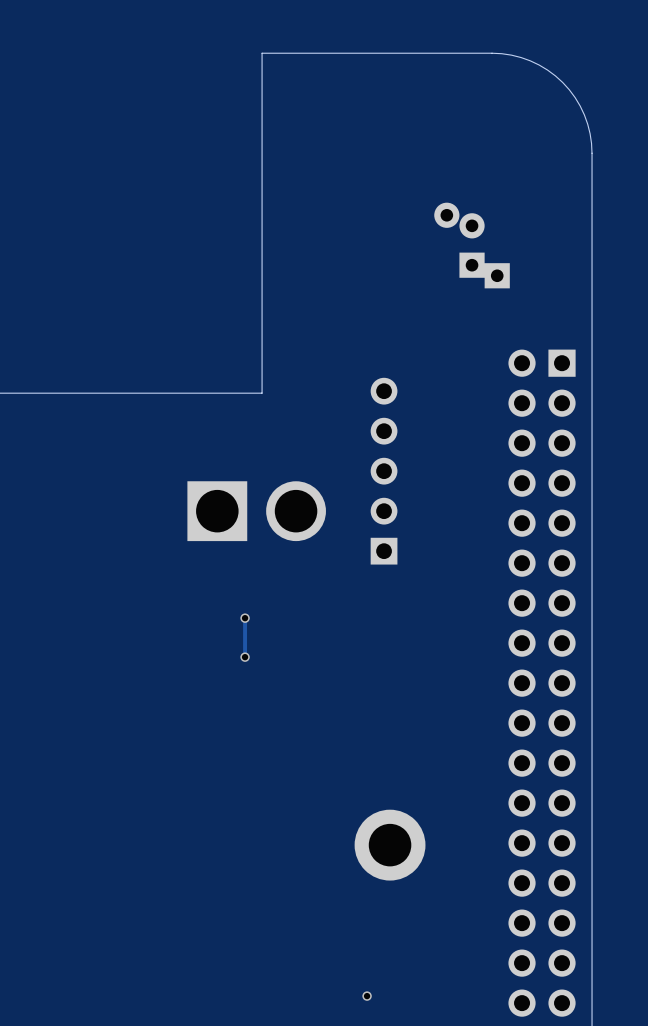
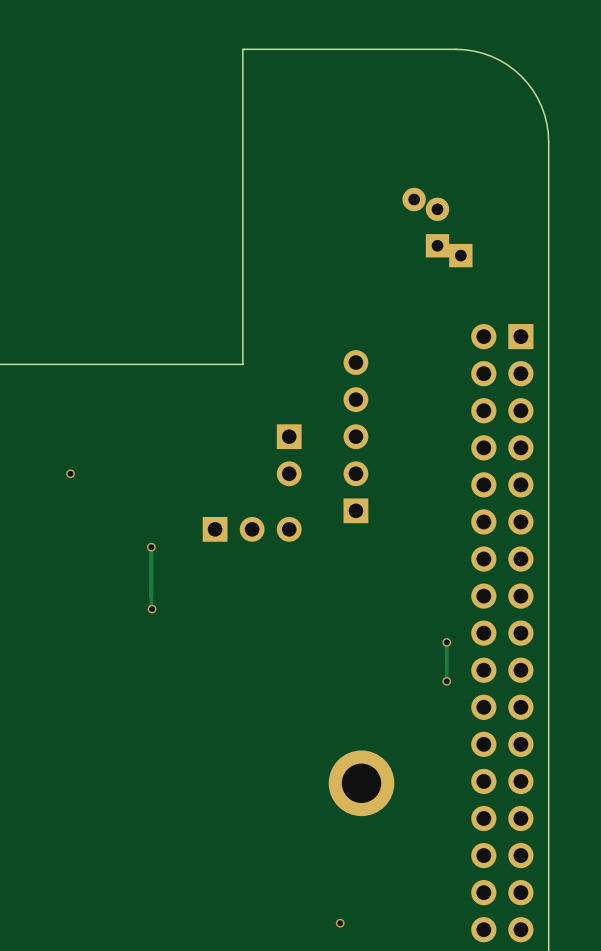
part: none -> (289, 455)
via: none -> (70, 473)
part: (256, 511) -> none
part: none -> (252, 529)
track: none -> (151, 547) (152, 609)
via: none -> (151, 547)
track: (245, 618) (245, 657) -> none
via: (245, 618) -> none
via: none -> (152, 609)
via: (245, 657) -> none
track: none -> (446, 642) (446, 681)
via: none -> (446, 642)
via: none -> (446, 681)

